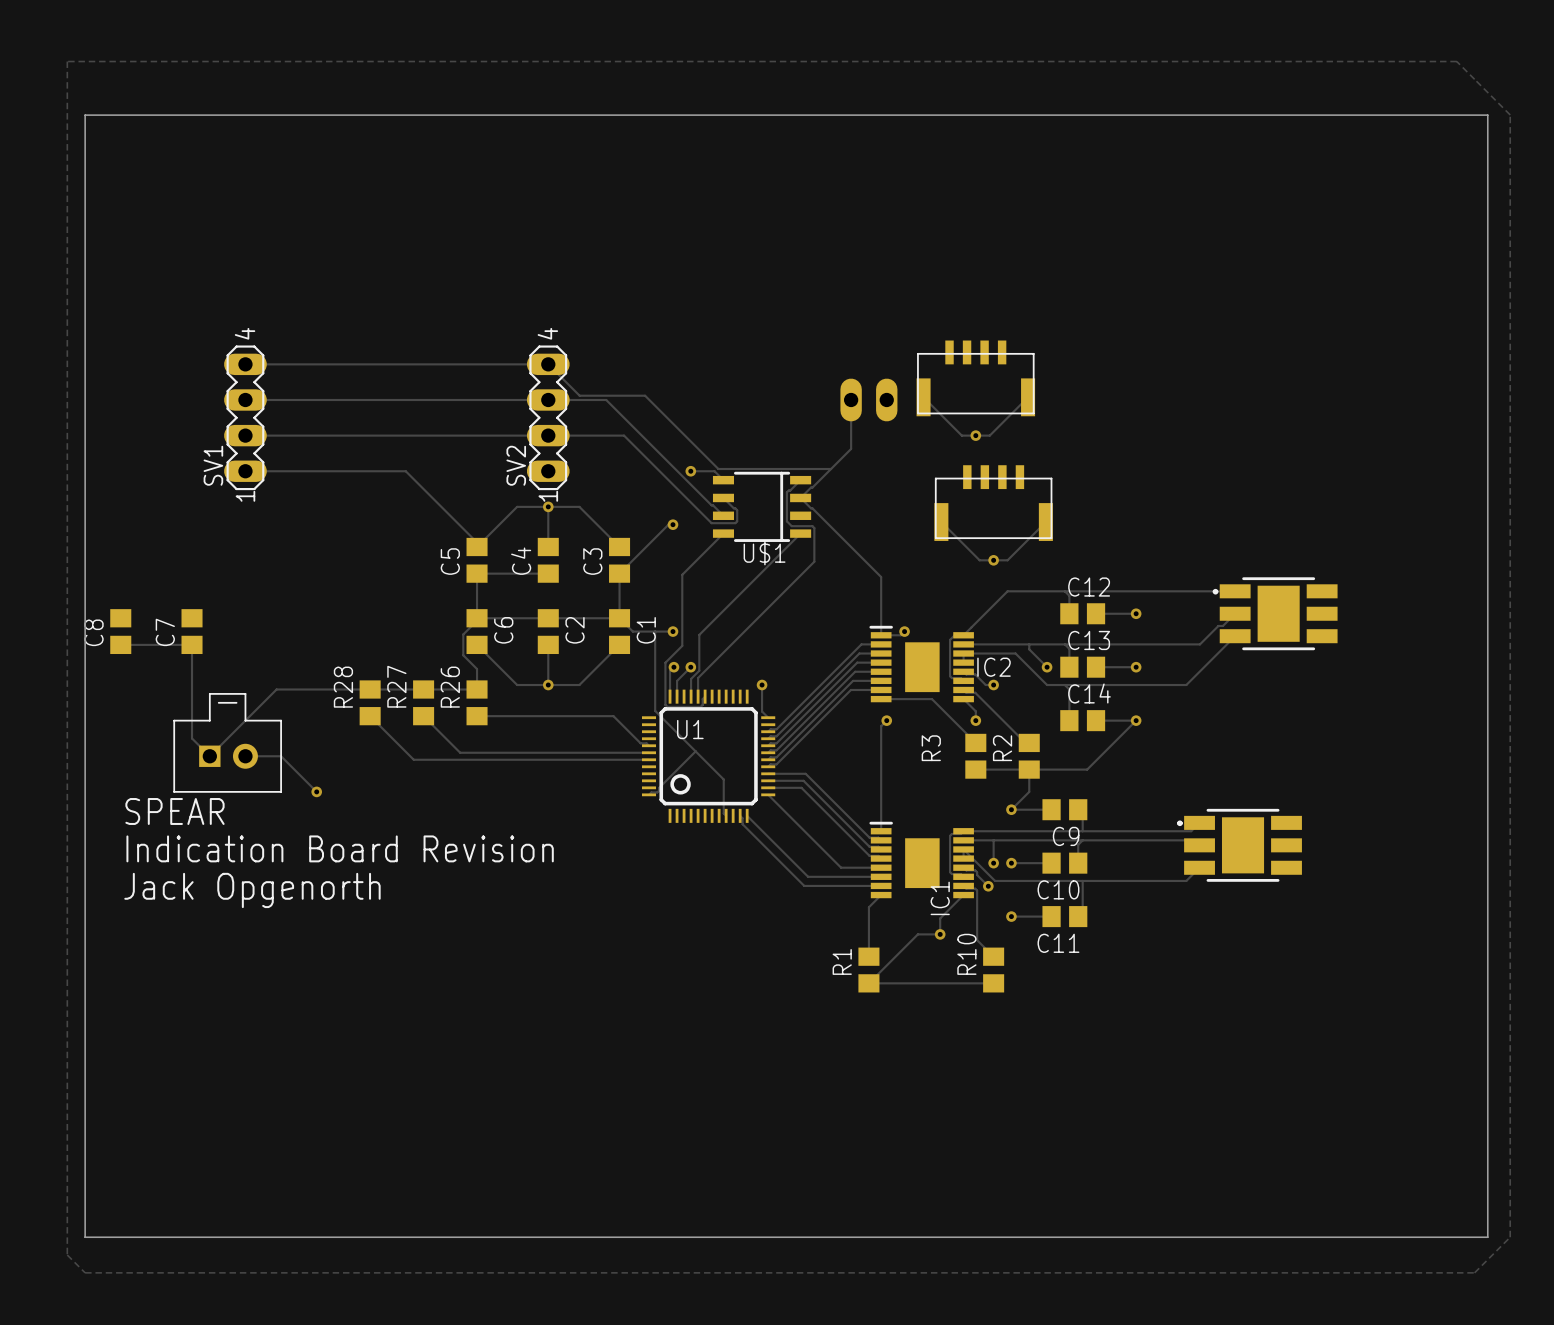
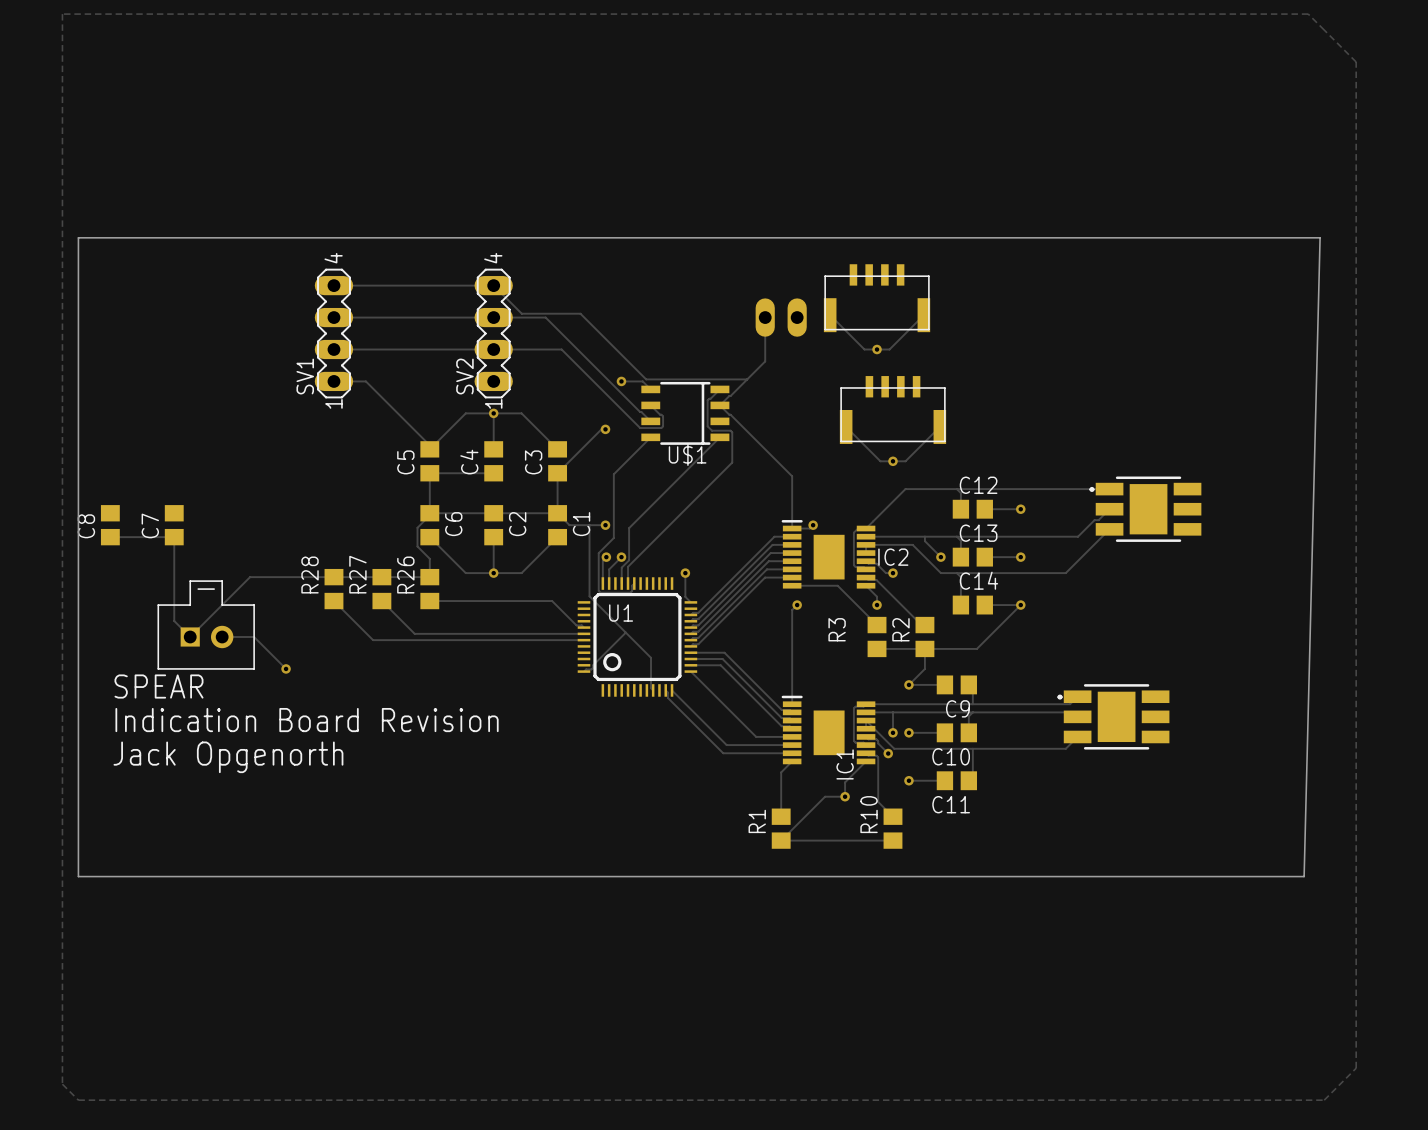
board edge: (85, 311) (85, 115) (1487, 115) (1487, 1237) (85, 1237) (85, 1023) -> (78, 237) (1320, 237) (1304, 876) (78, 876)
track: (245, 364) (370, 364) -> none
track: (245, 399) (370, 399) -> none
SV1 position: (245, 417) -> (333, 333)
track: (245, 435) (370, 435) -> none
track: (245, 471) (370, 471) -> none

